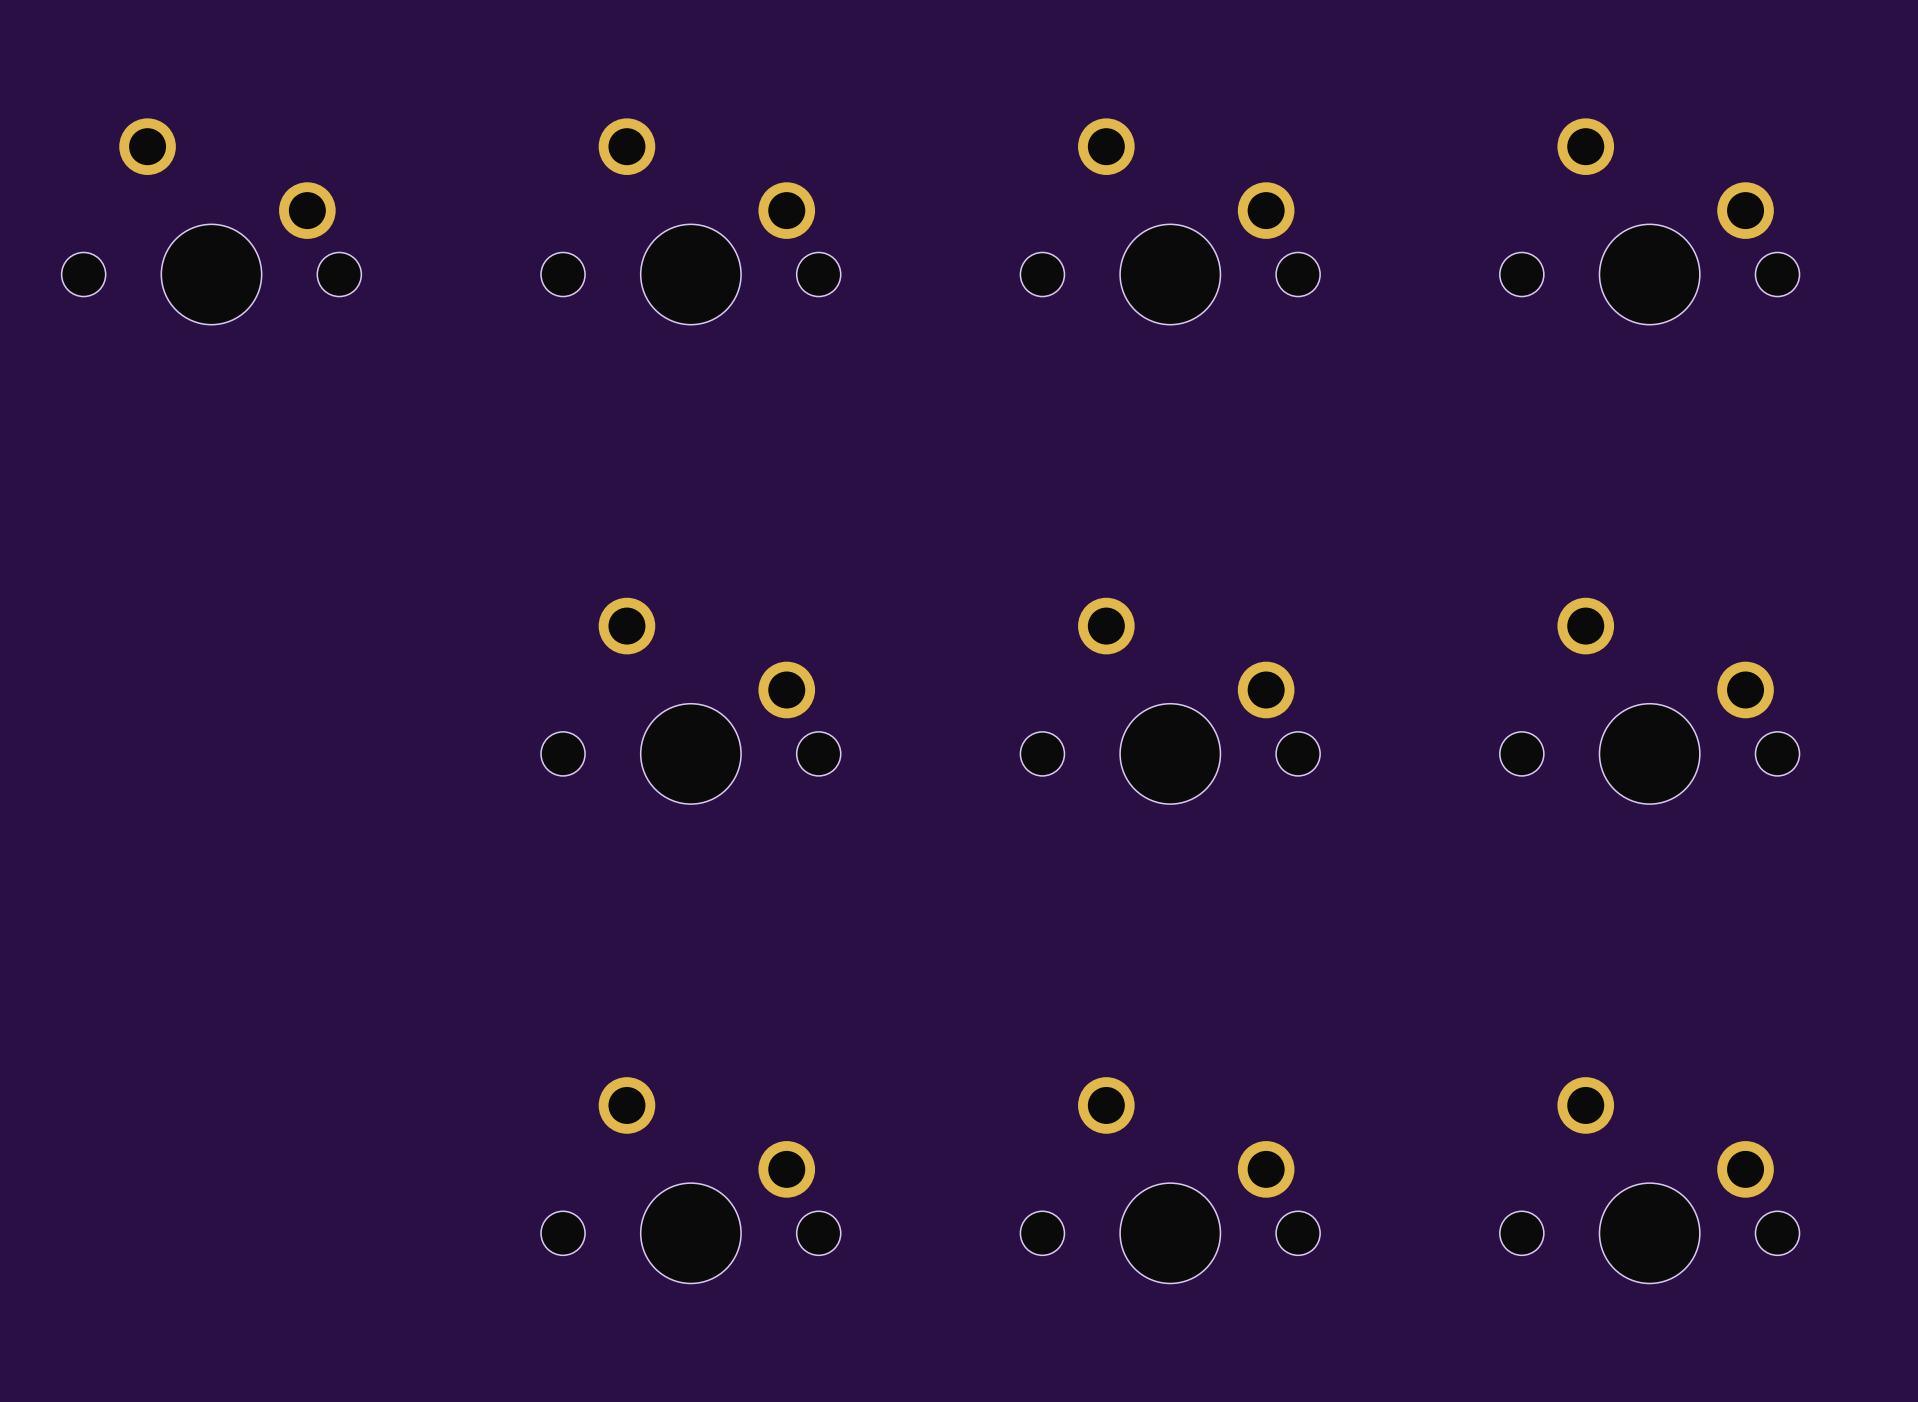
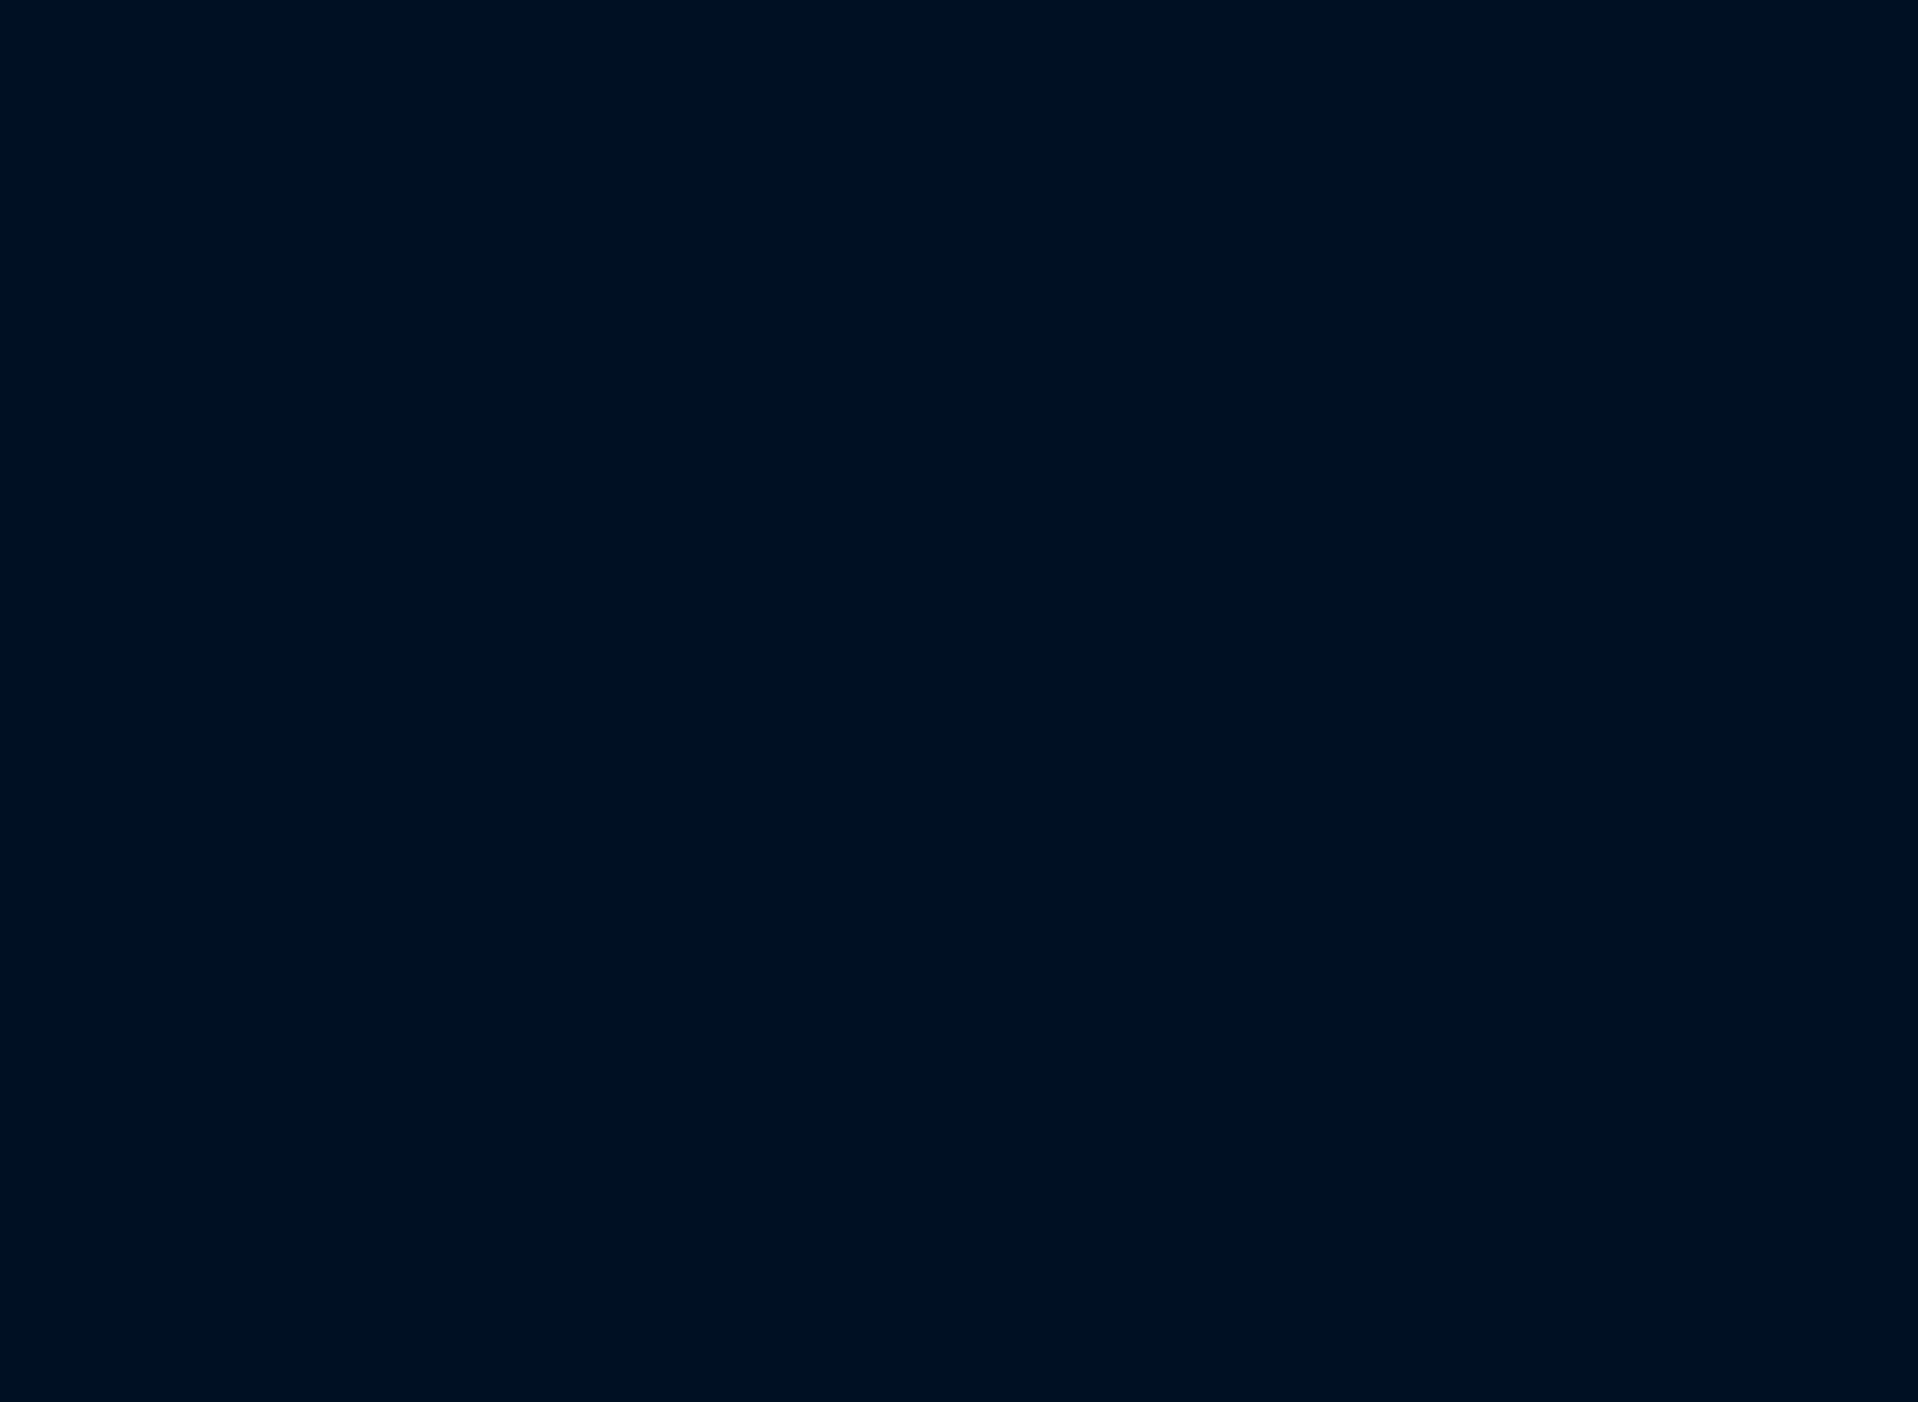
part: (211, 221) -> none
part: (690, 221) -> none
part: (1170, 221) -> none
part: (1649, 221) -> none
part: (690, 700) -> none
part: (1170, 700) -> none
part: (1649, 700) -> none
part: (690, 1180) -> none
part: (1170, 1180) -> none
part: (1649, 1180) -> none

